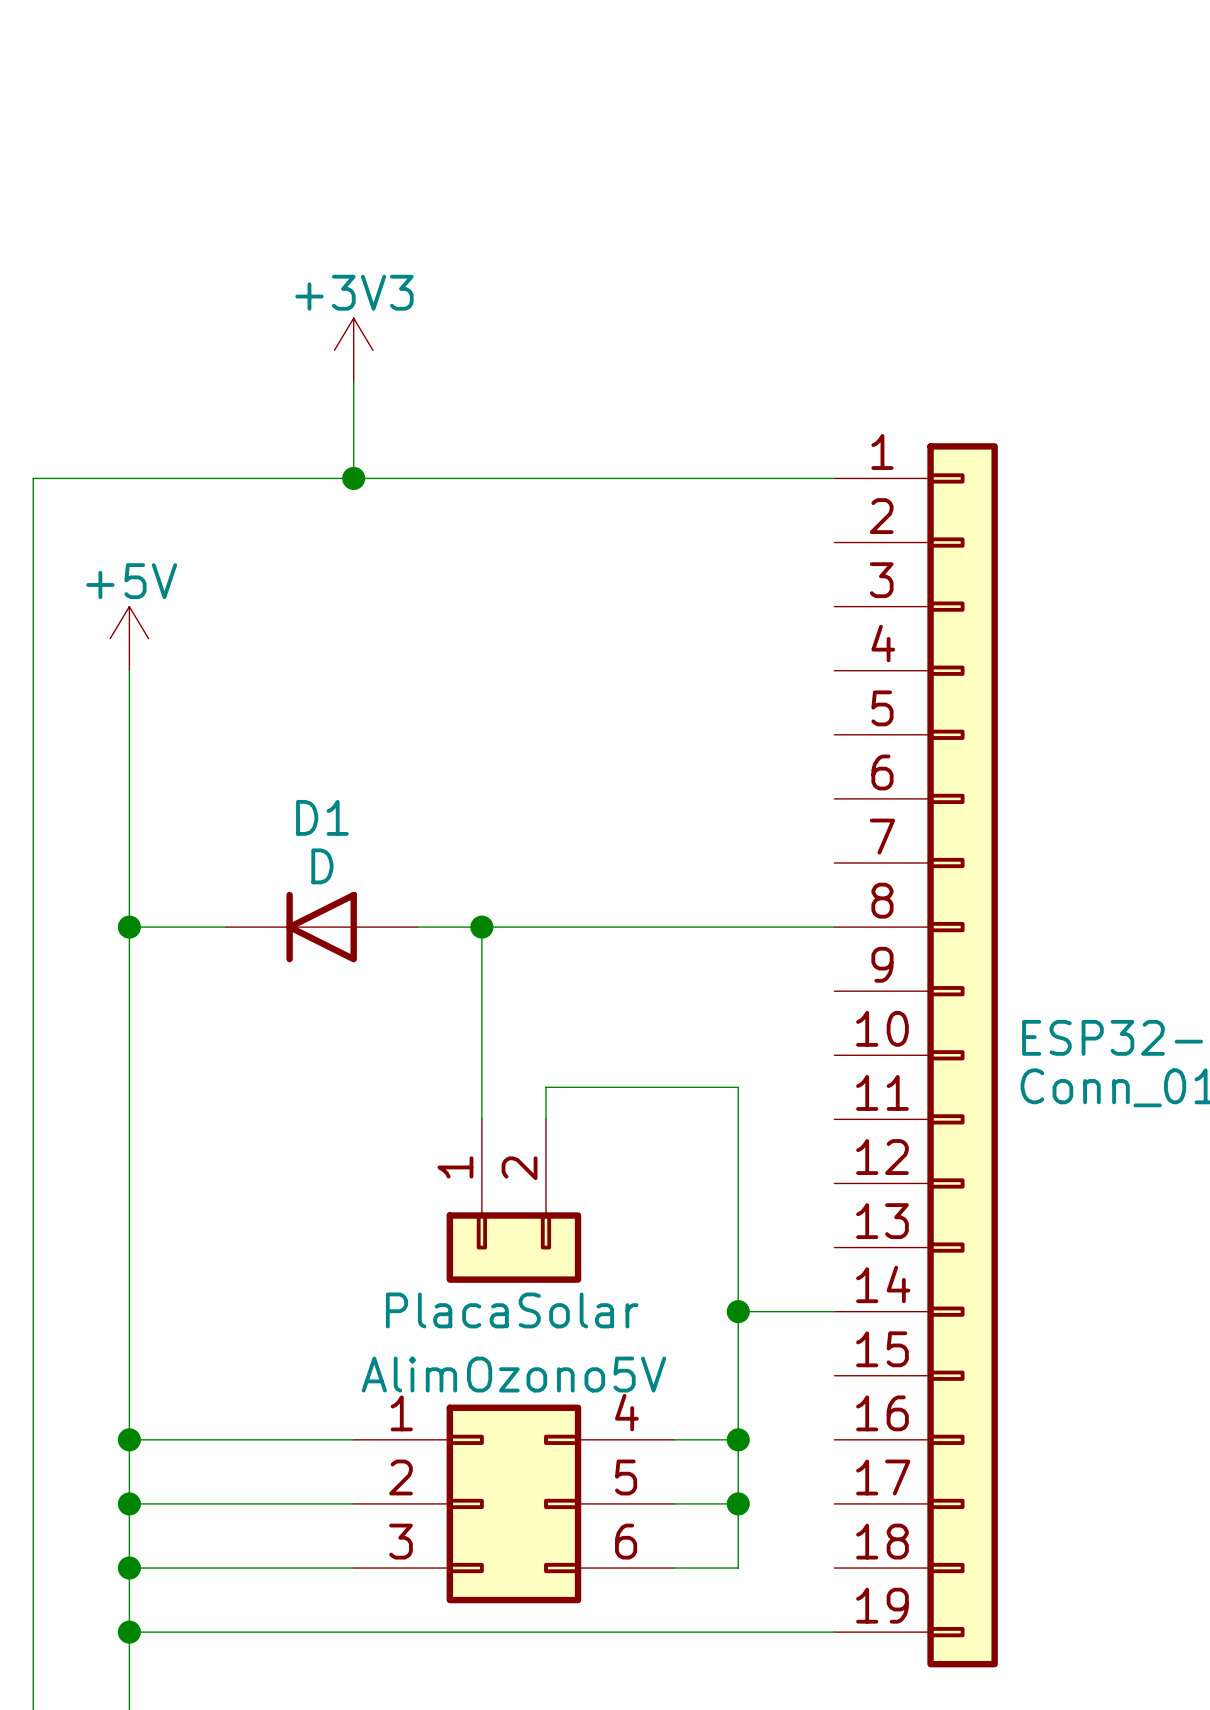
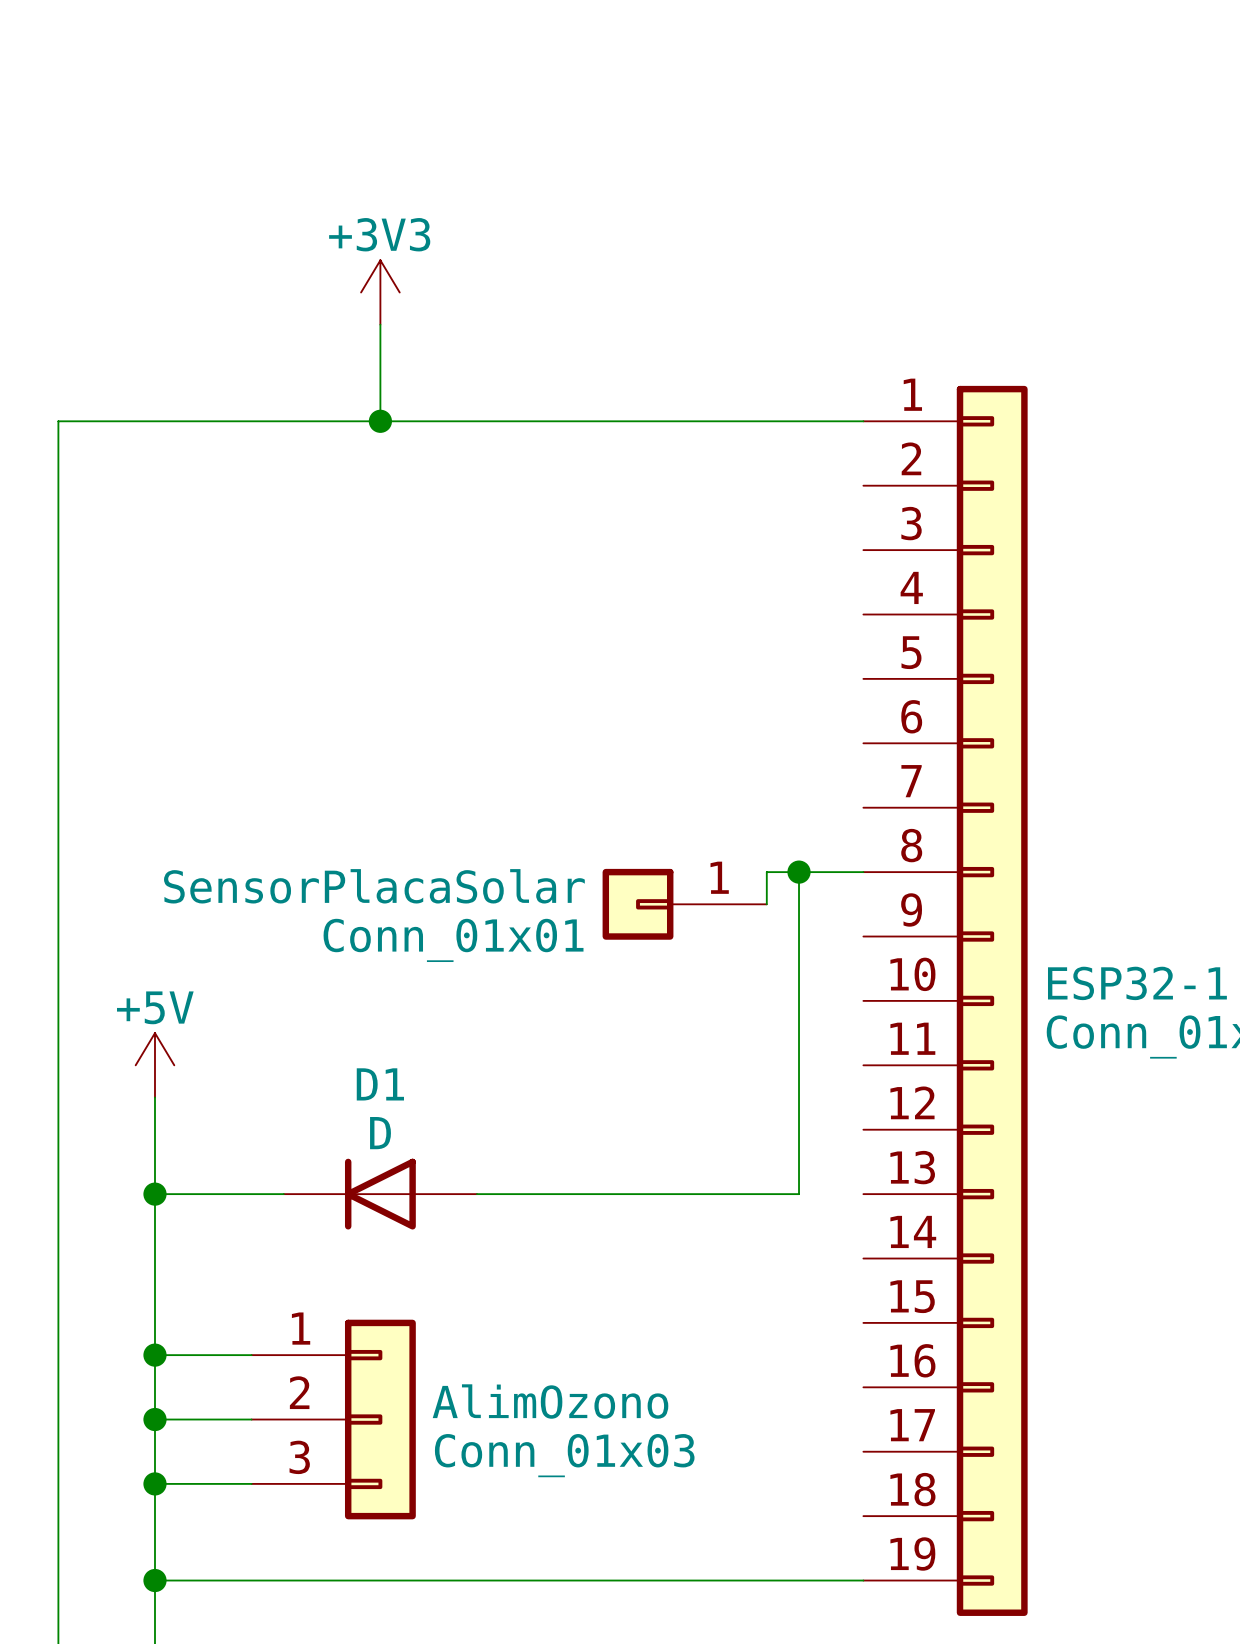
power symbol position: +5V (129, 638) -> +5V (154, 1065)
wire: (129, 670) (129, 1151) -> none
wire: (129, 927) (225, 927) -> (154, 1355) (251, 1355)
junction: (129, 927) -> none
D1 position: (321, 927) -> (380, 1194)
wire: (417, 927) (738, 927) -> (766, 904) (766, 872)
wire: (481, 927) (481, 1119) -> none
junction: (481, 927) -> none
wire: none -> (799, 872) (799, 1194) (477, 1194)
junction: none -> (799, 872)
SensorPlacaSolar: none -> Conn_01x01 (684, 904)
wire: (545, 1119) (545, 1087) (738, 1087) (738, 1568) (674, 1568) -> none
PlacaSolar: (513, 1201) -> none
wire: none -> (154, 1194) (283, 1194)
junction: none -> (154, 1194)
wire: (738, 1311) (834, 1311) -> (154, 1419) (251, 1419)
junction: (738, 1311) -> none
junction: none -> (154, 1355)
wire: (129, 1439) (353, 1439) -> none
junction: (129, 1439) -> none
wire: (674, 1439) (738, 1439) -> none
junction: (738, 1439) -> none
junction: none -> (154, 1419)
AlimOzono: none -> Conn_01x03 (333, 1419)
wire: (129, 1503) (353, 1503) -> none
junction: (129, 1503) -> none
AlimOzono5V: (513, 1503) -> none
wire: (674, 1503) (738, 1503) -> none
junction: (738, 1503) -> none
wire: none -> (154, 1483) (251, 1483)
junction: none -> (154, 1483)
wire: (129, 1568) (353, 1568) -> none
junction: (129, 1568) -> none

